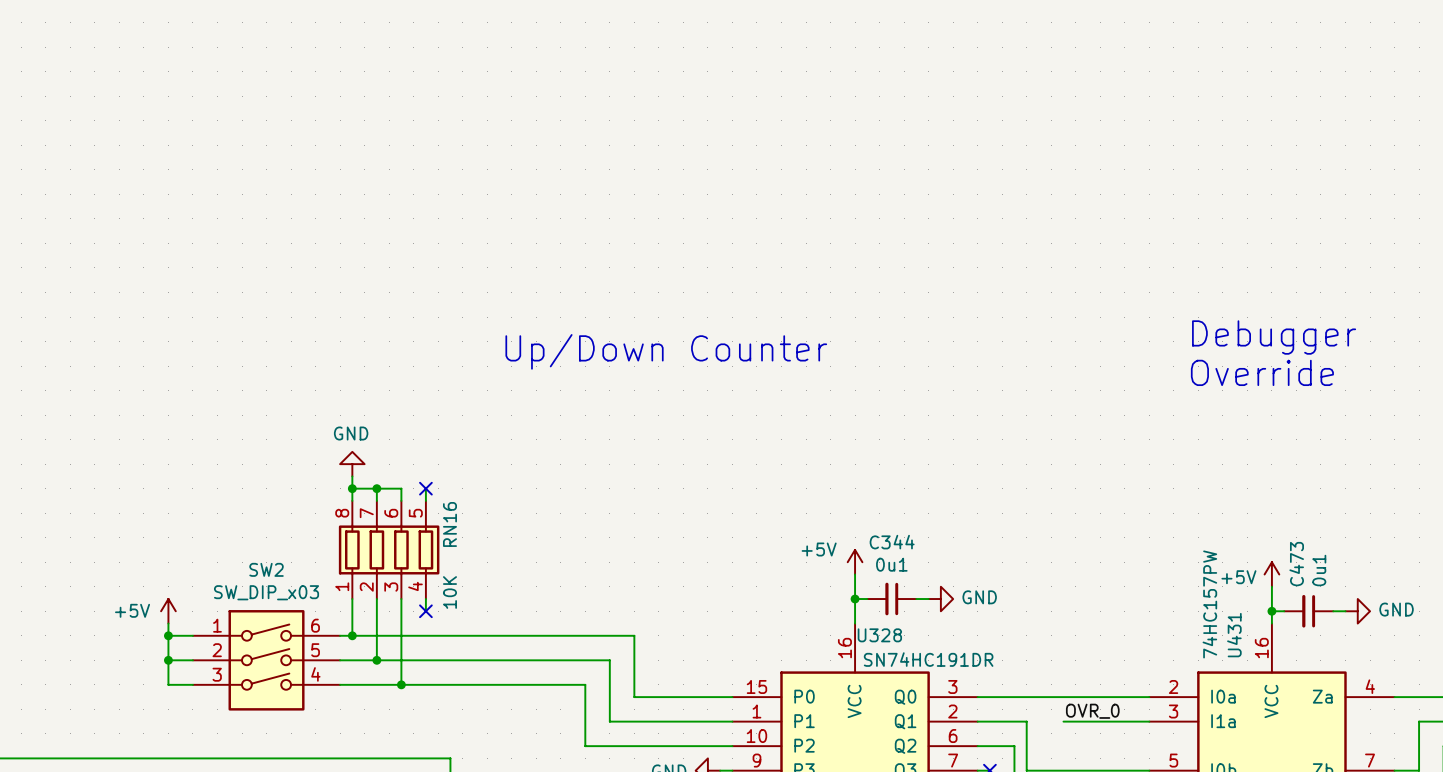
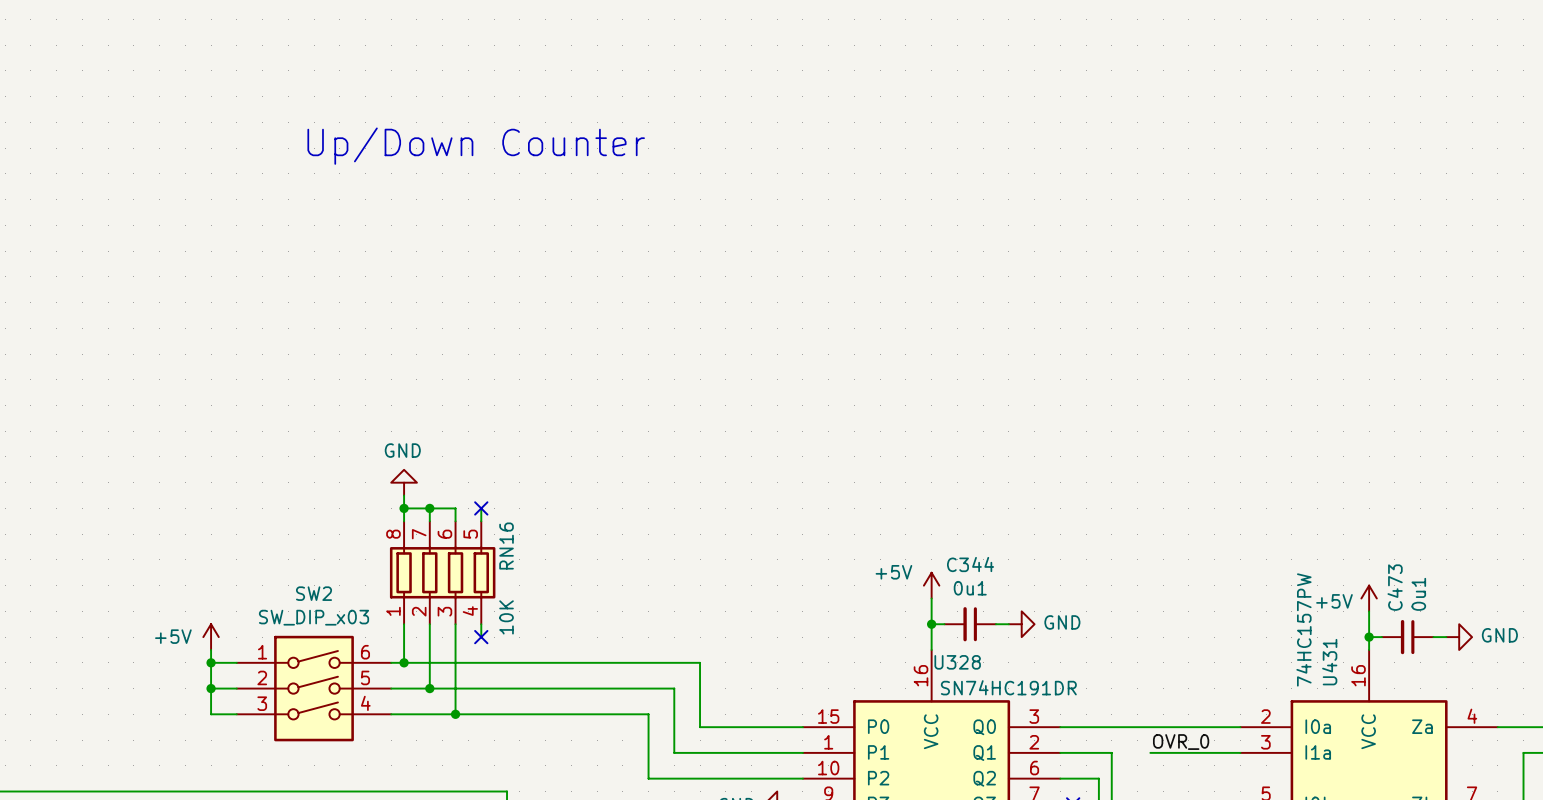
text: none -> Up/Down Counter (476, 146)
text: Debugger (1274, 337) -> none
text: Up/Down Counter (666, 351) -> none
text: Override (1262, 372) -> none

